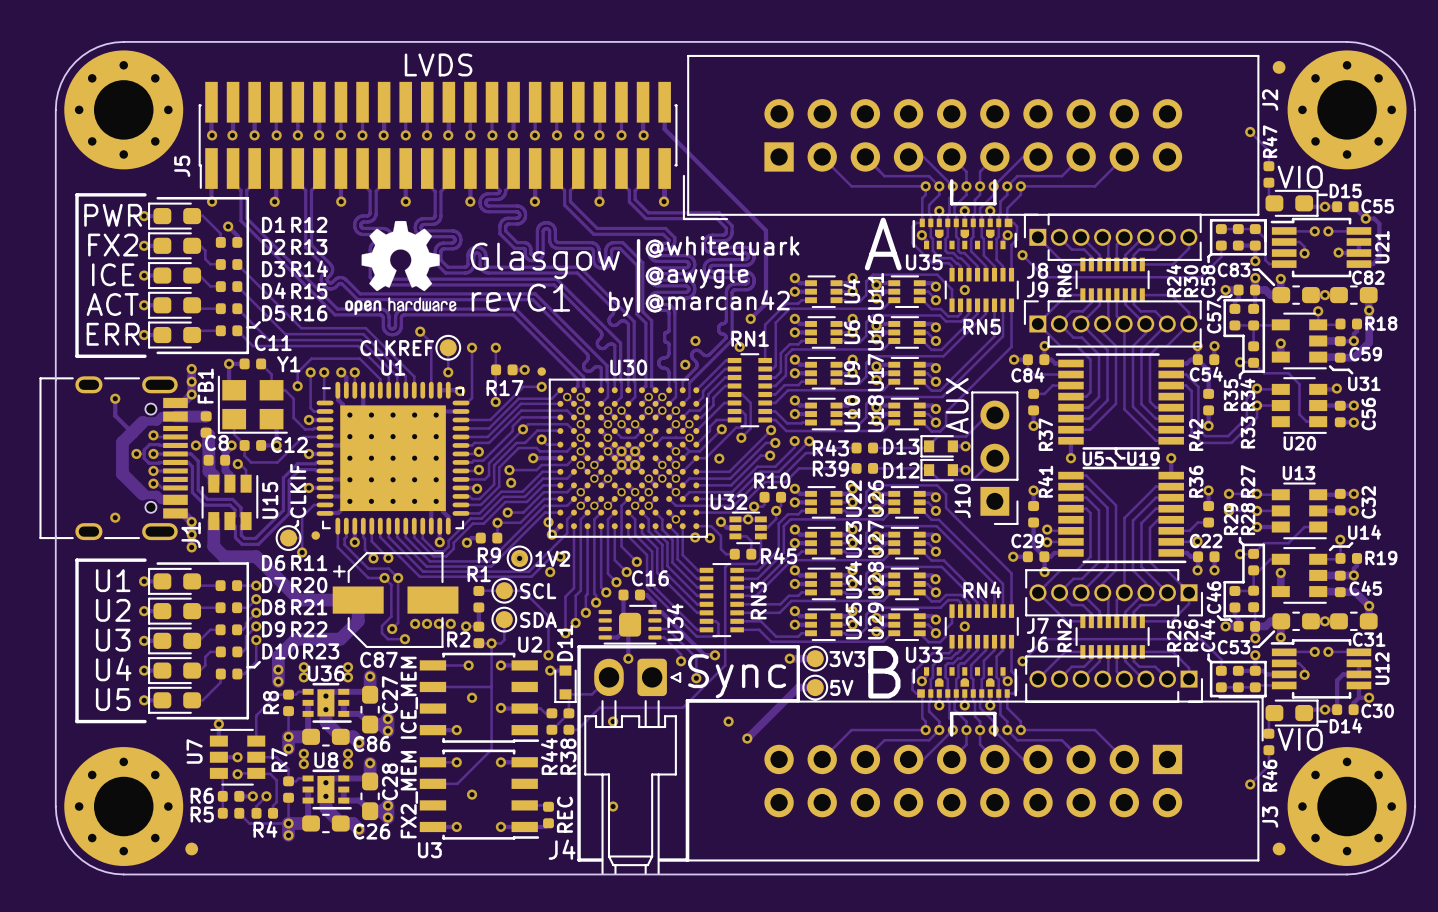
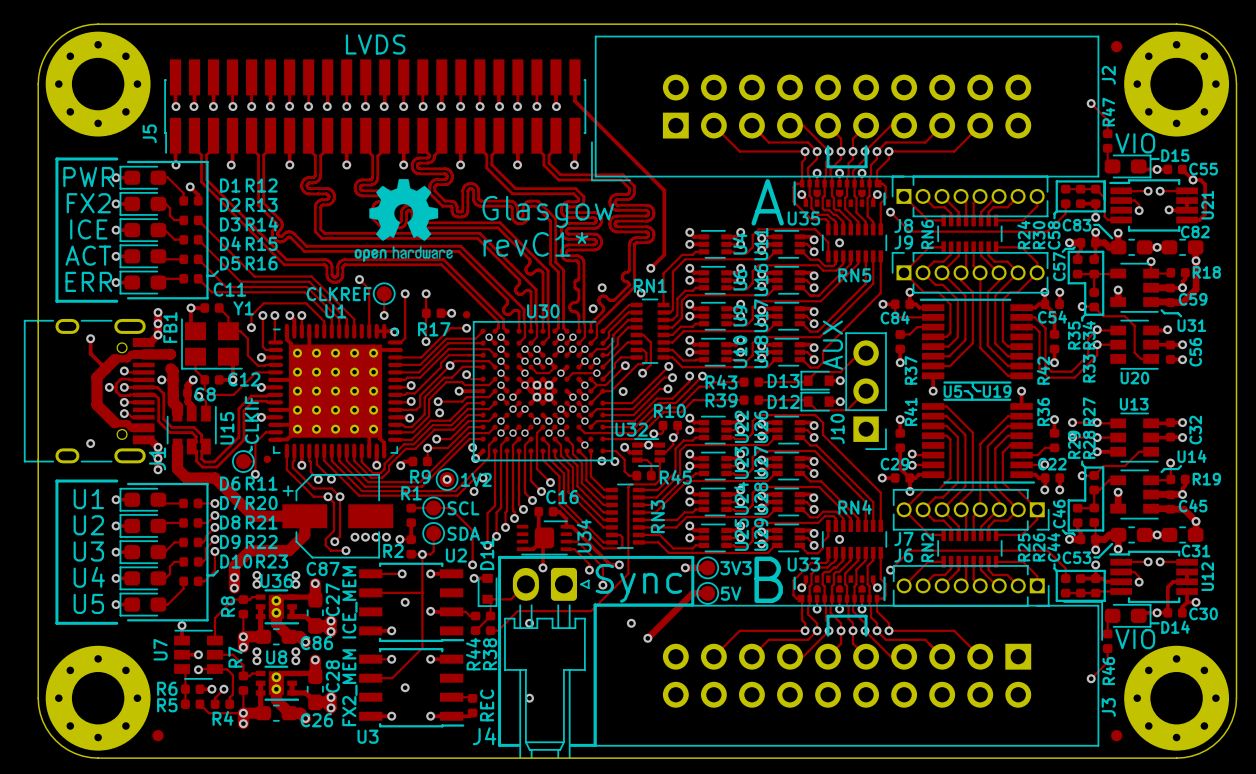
line: (638, 240) (638, 311) -> none
text: @whitequark (722, 248) -> none
text position: Glasgow (545, 260) -> Glasgow (548, 211)
drawing position: (400, 268) -> (403, 220)
text: @awygle (697, 276) -> none
text: revC1 (520, 297) -> revC1* (536, 244)
text: @marcan42 (717, 301) -> none
text: by (621, 304) -> none
C8 name position: C8 (216, 443) -> C8 (205, 394)

